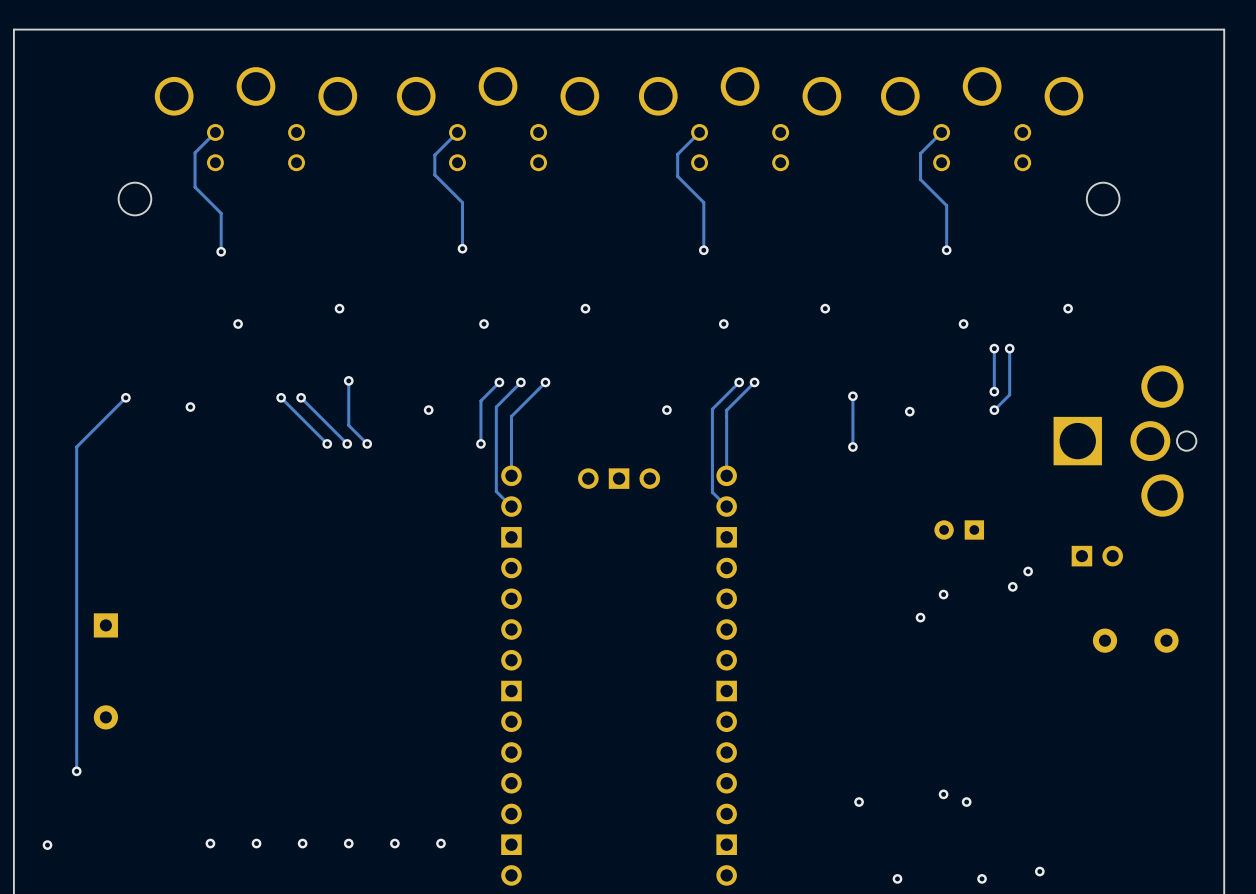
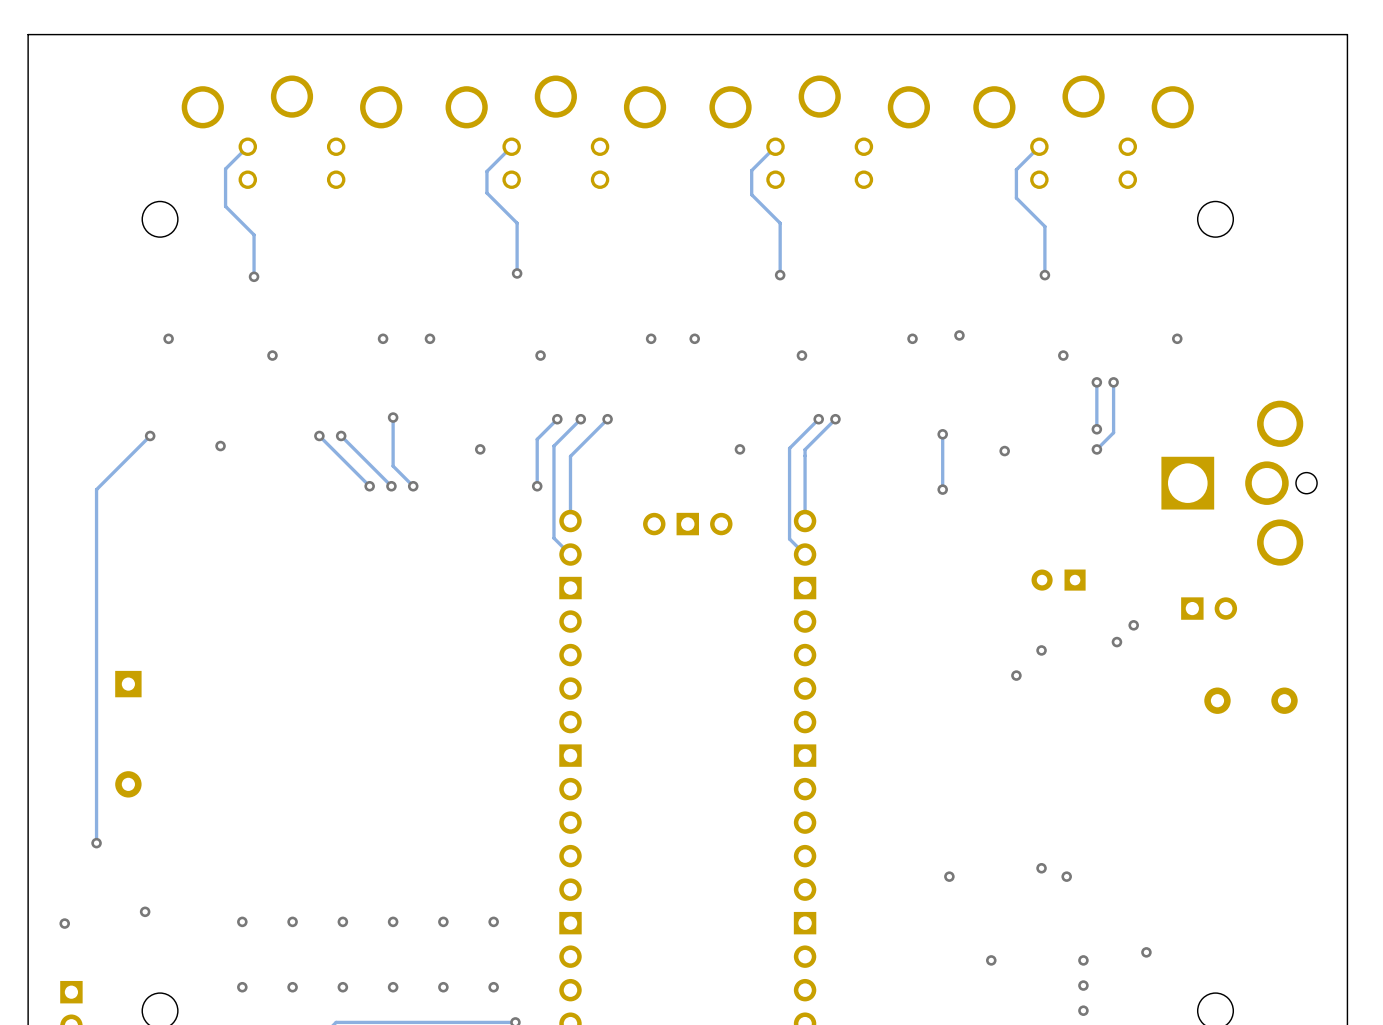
via: none -> (959, 335)
via: none -> (168, 338)
via: none -> (429, 338)
via: none -> (694, 338)
via: none -> (145, 911)

